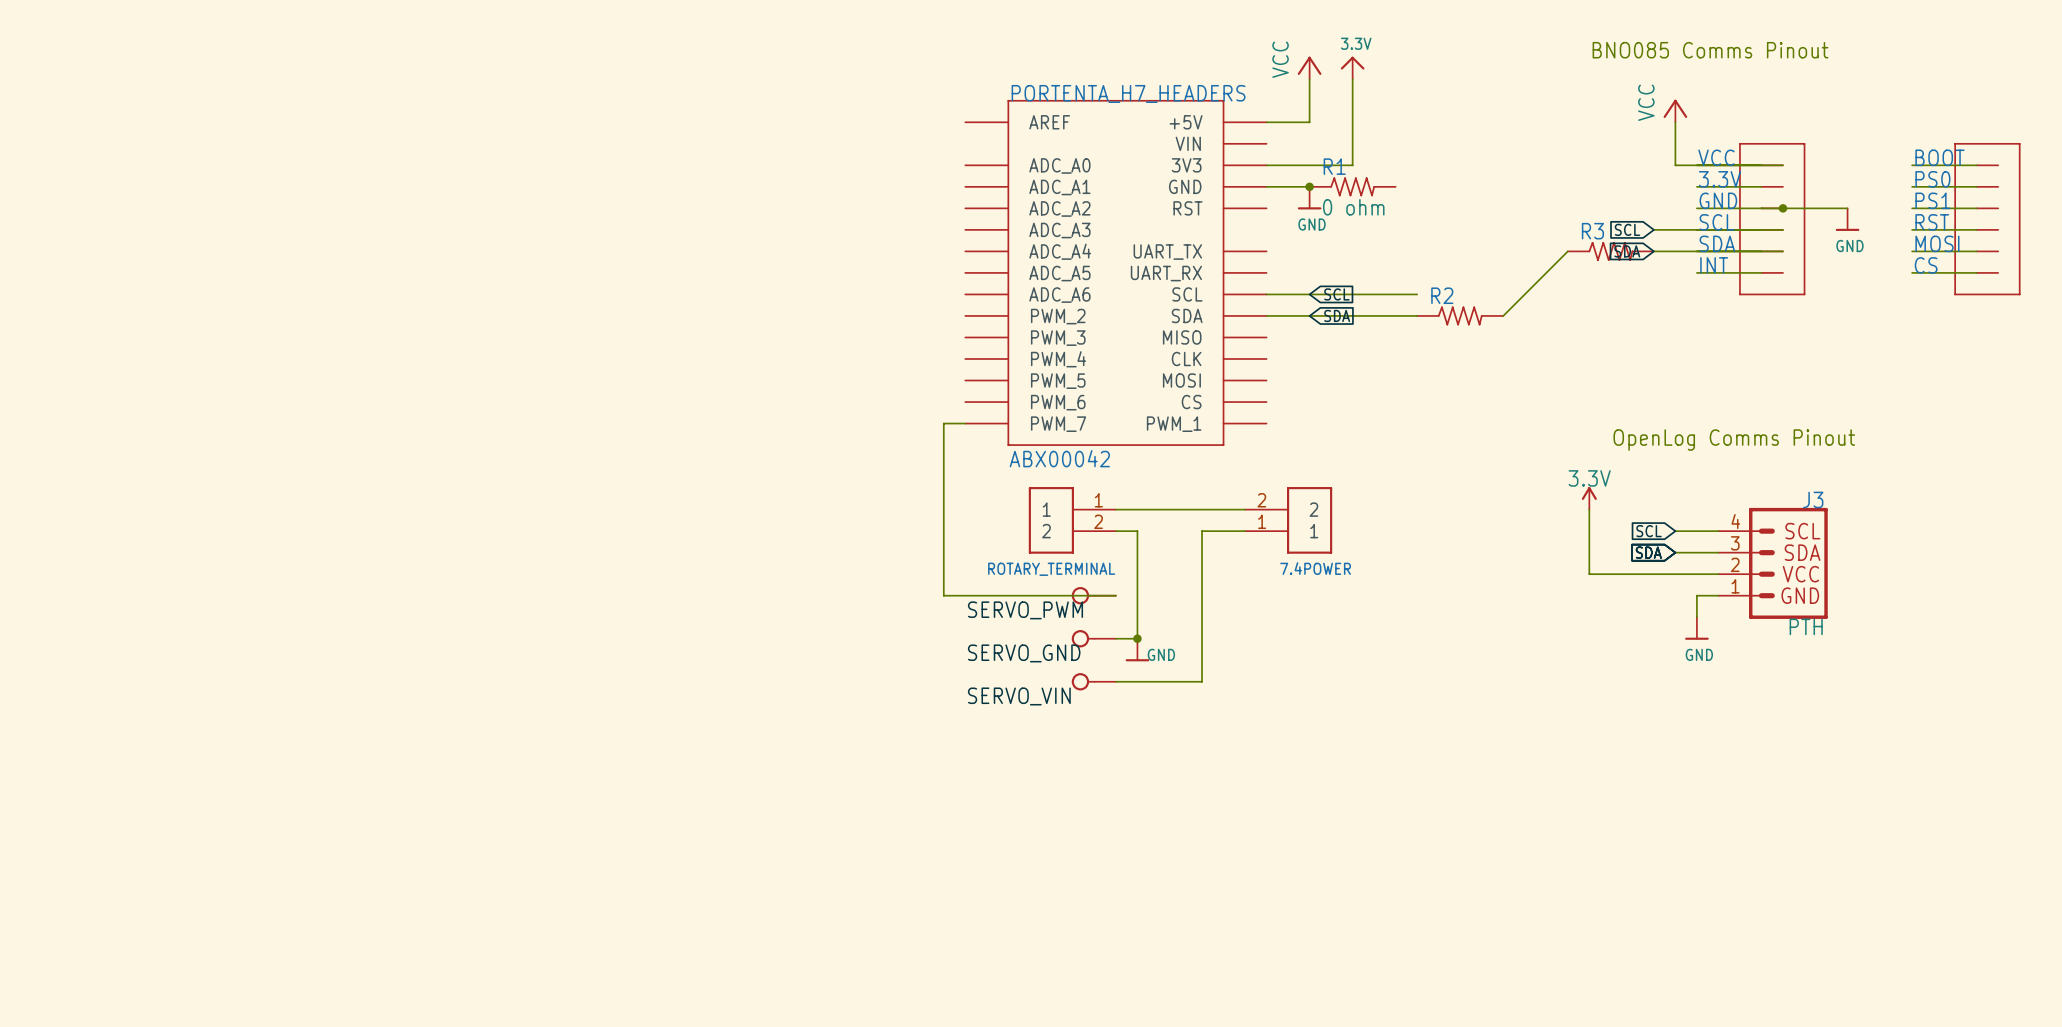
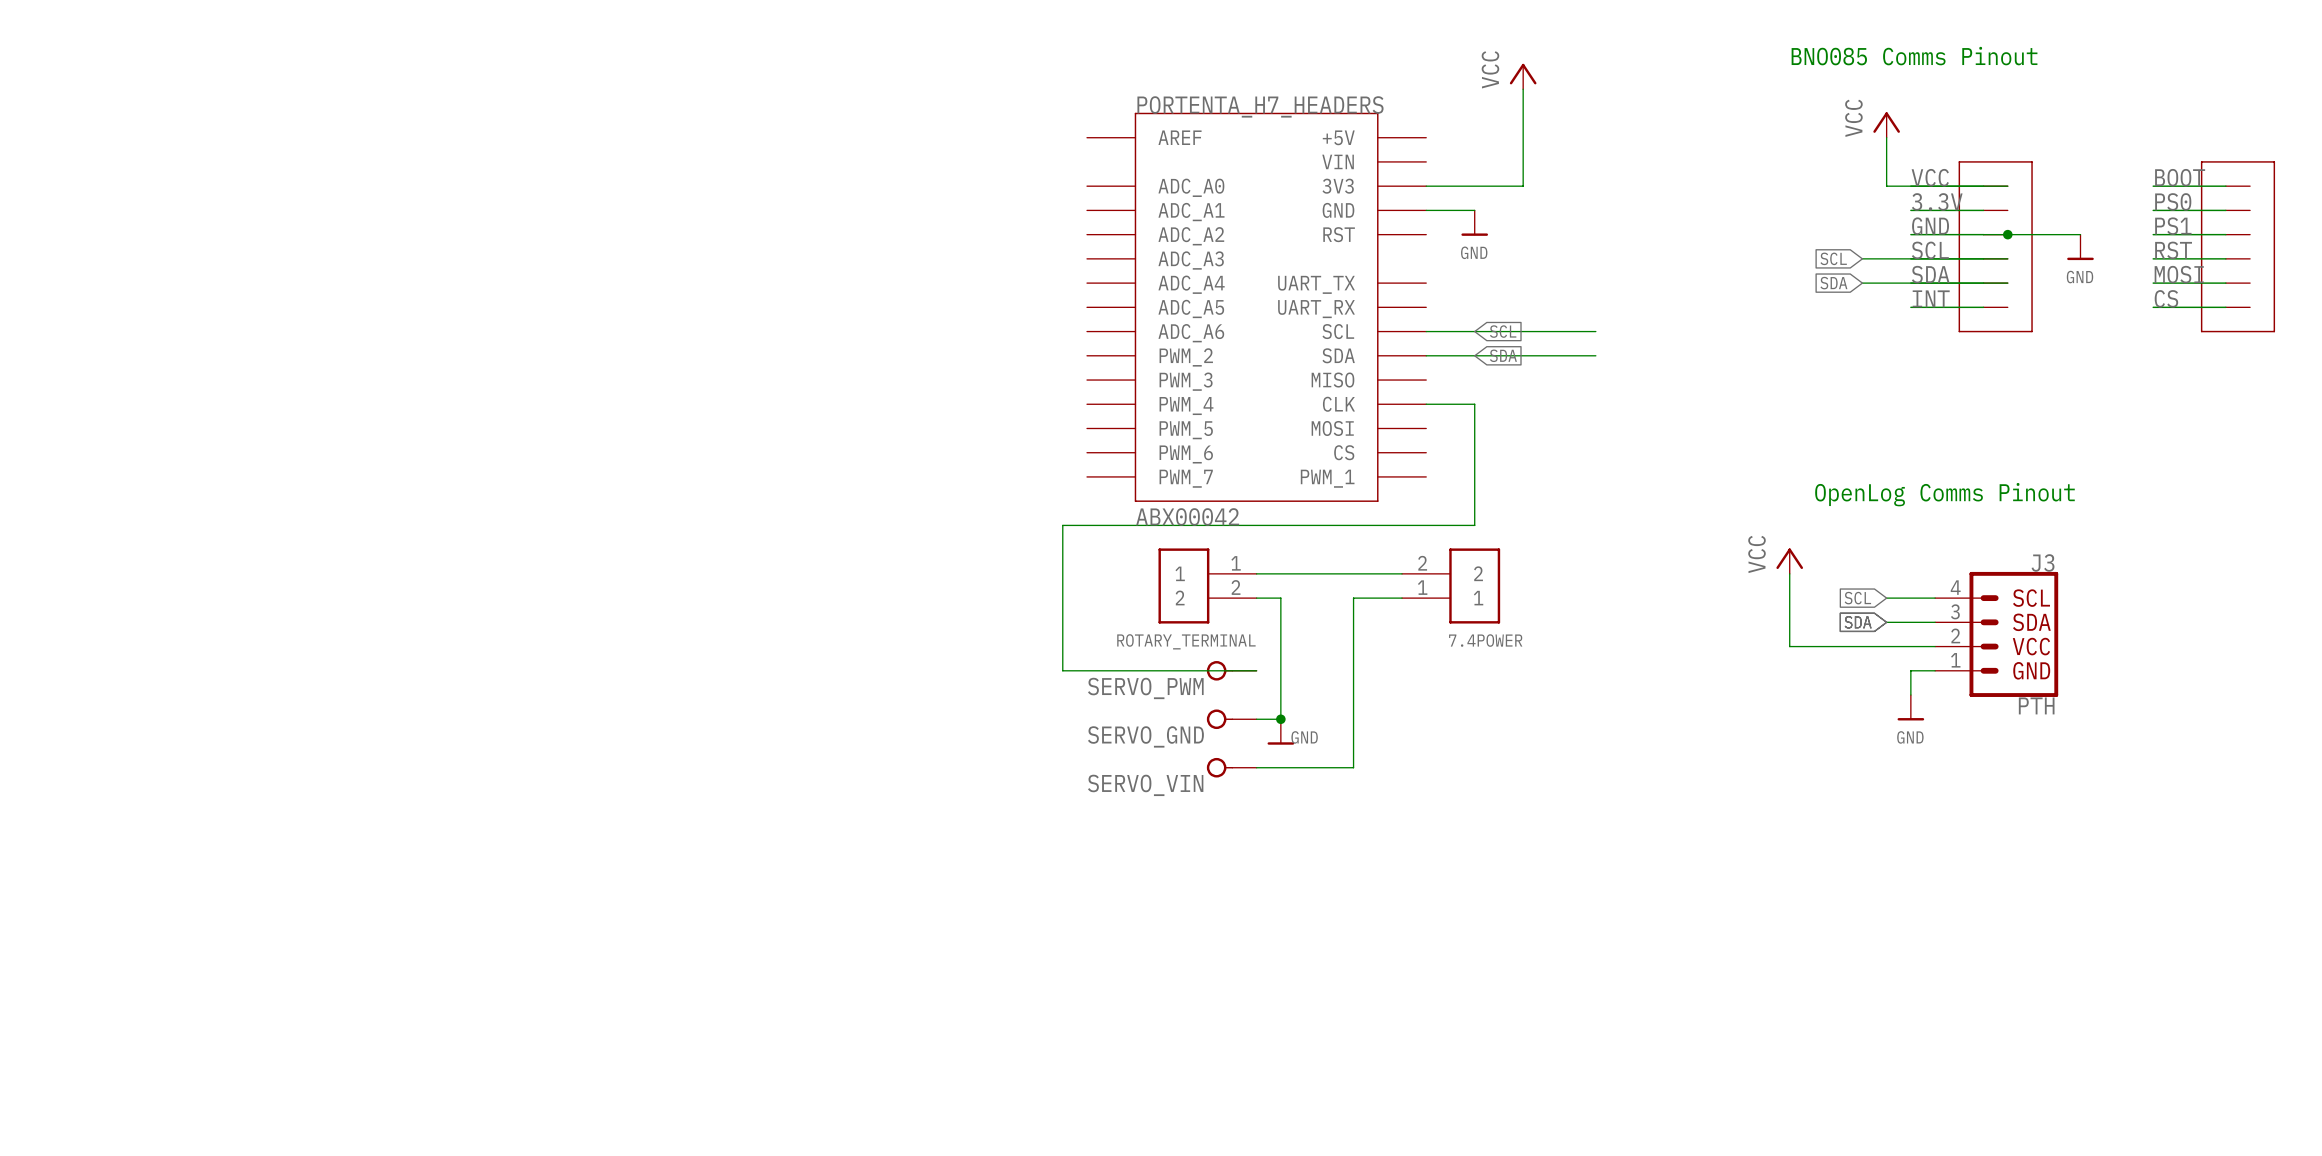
power symbol: VCC (1309, 67) -> none
power symbol: 3.3V (1352, 67) -> VCC (1523, 76)
wire: (1309, 79) (1309, 122) (1266, 122) -> none
junction: (1309, 186) -> none
R1: 0 ohm (1352, 186) -> none
wire: (1567, 251) (1503, 315) -> none
R3: (1610, 251) -> none
R2: (1460, 315) -> none
wire: (965, 423) (943, 423) (943, 466) -> (1426, 404) (1474, 404) (1474, 525) (1062, 525)
power symbol: 3.3V (1589, 498) -> VCC (1789, 561)

